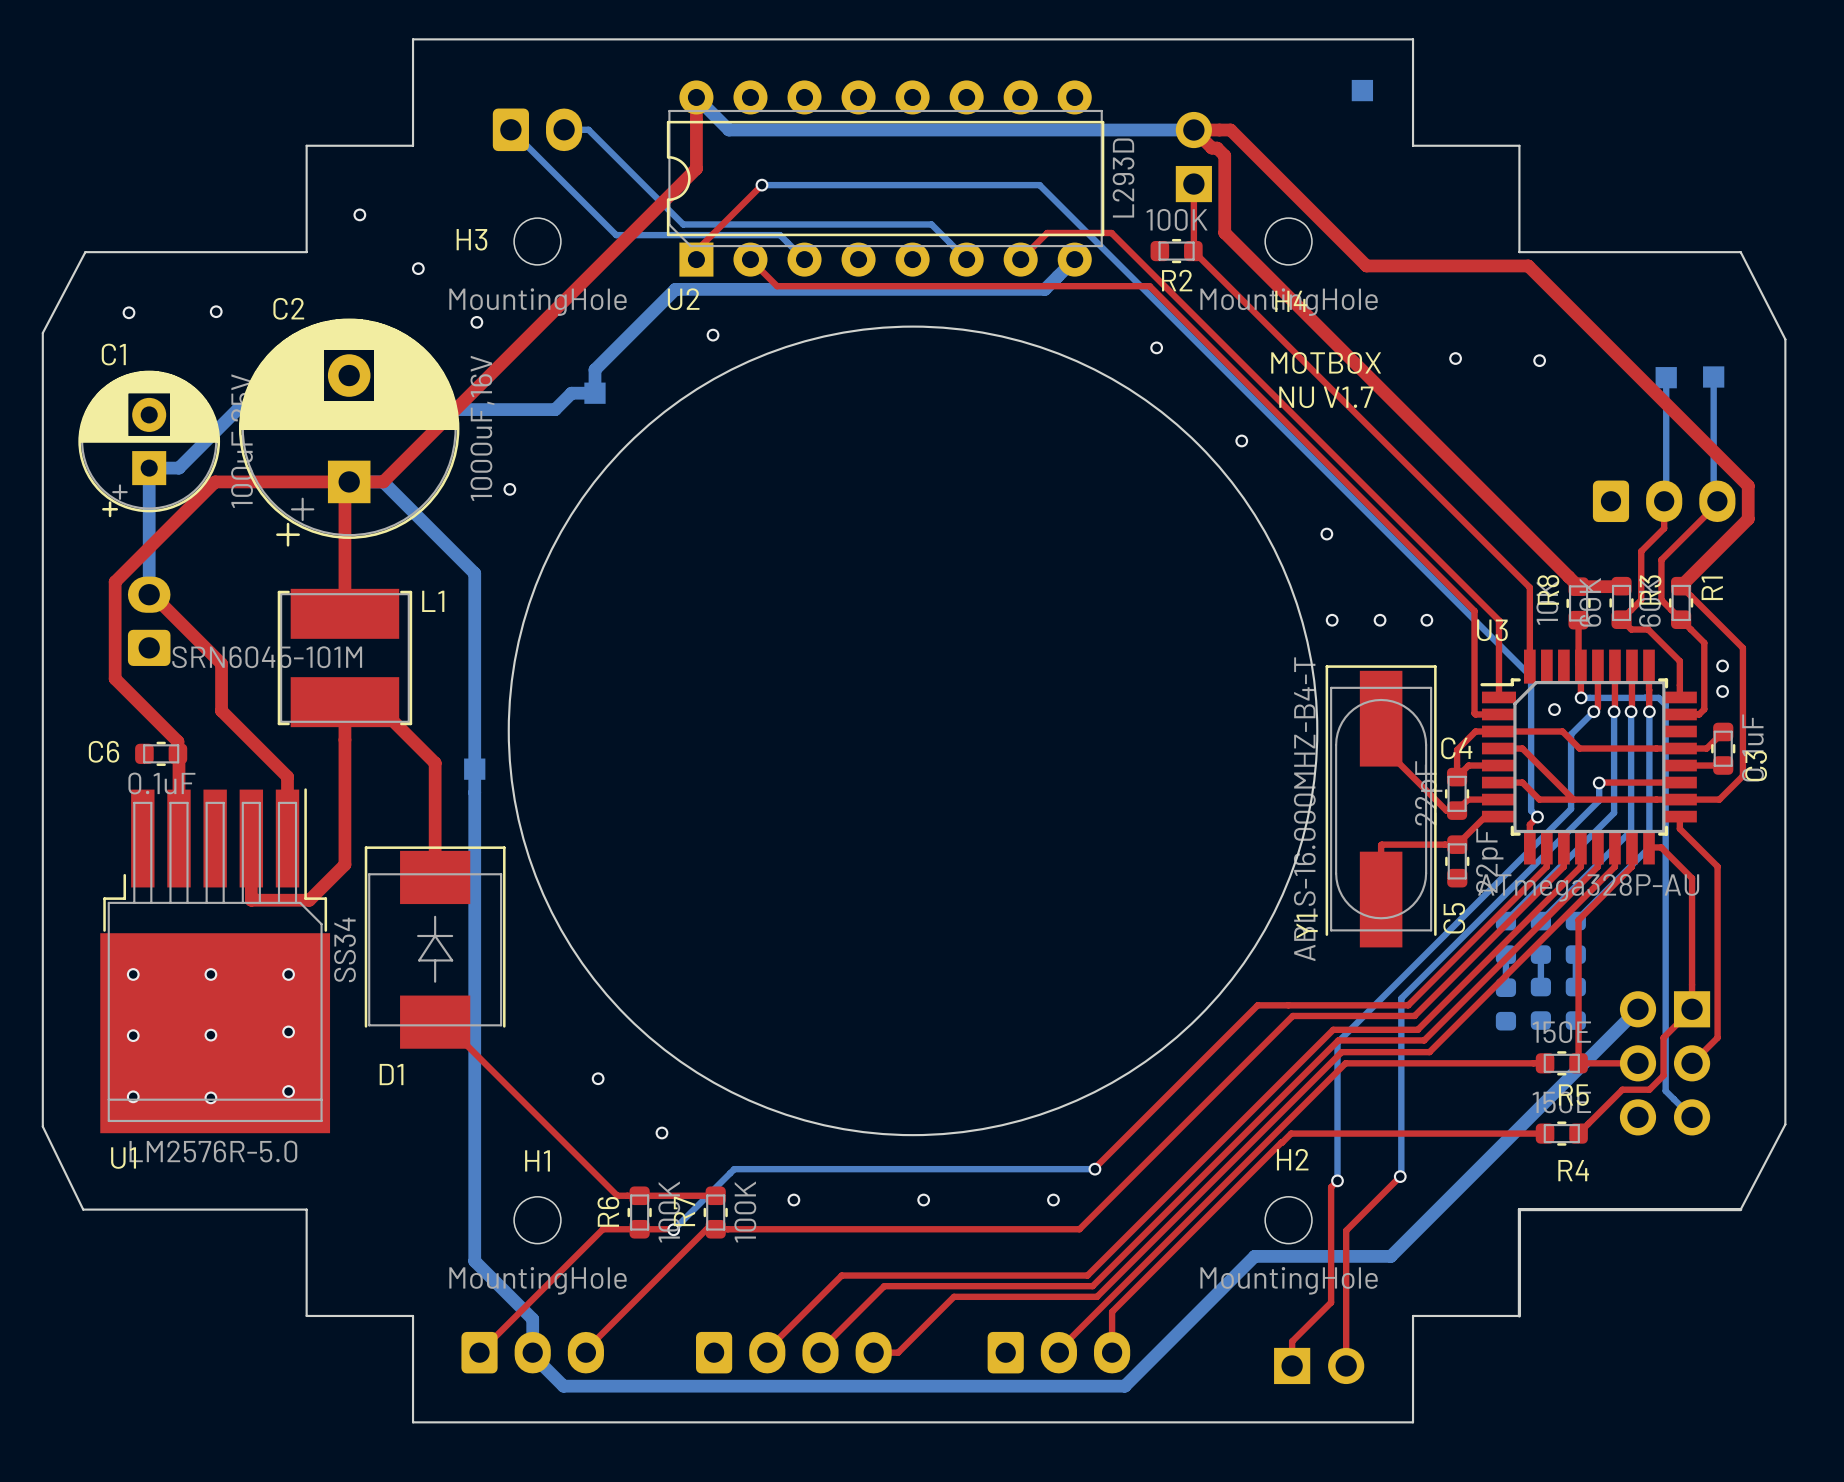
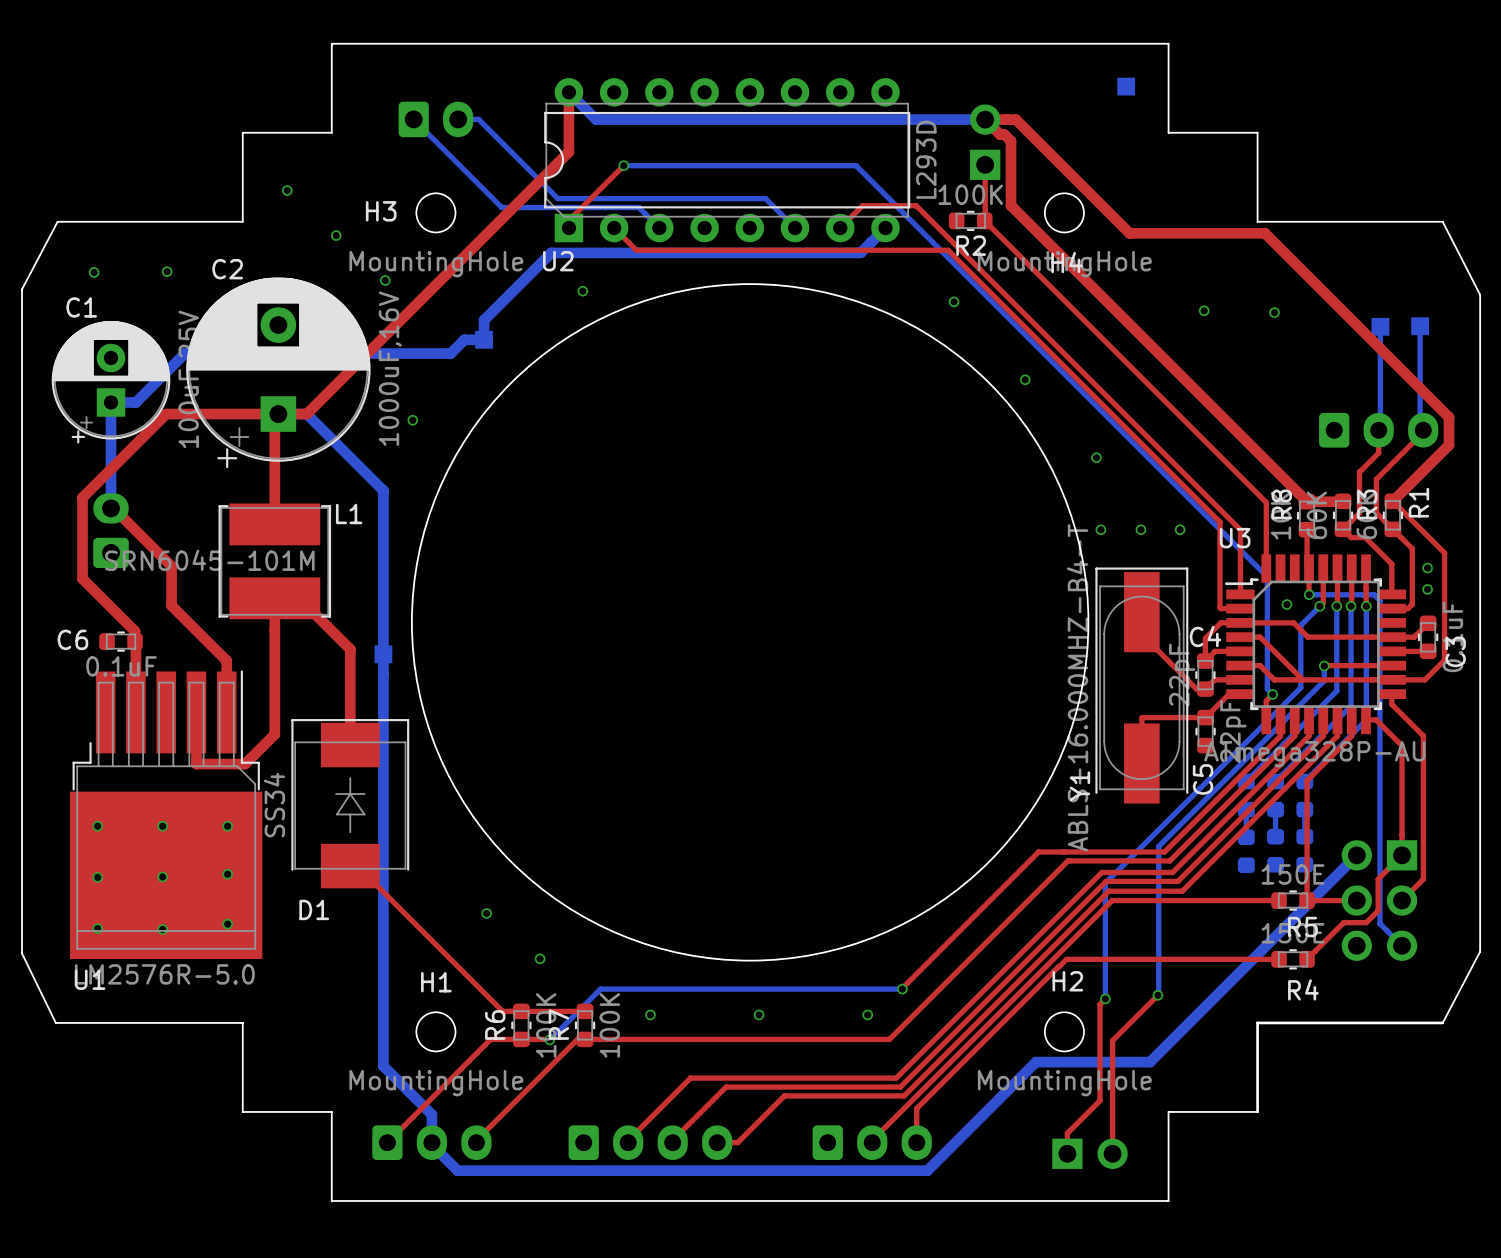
text: MOTBOX (1326, 362) -> none
text: NU V1.7 (1326, 397) -> none

